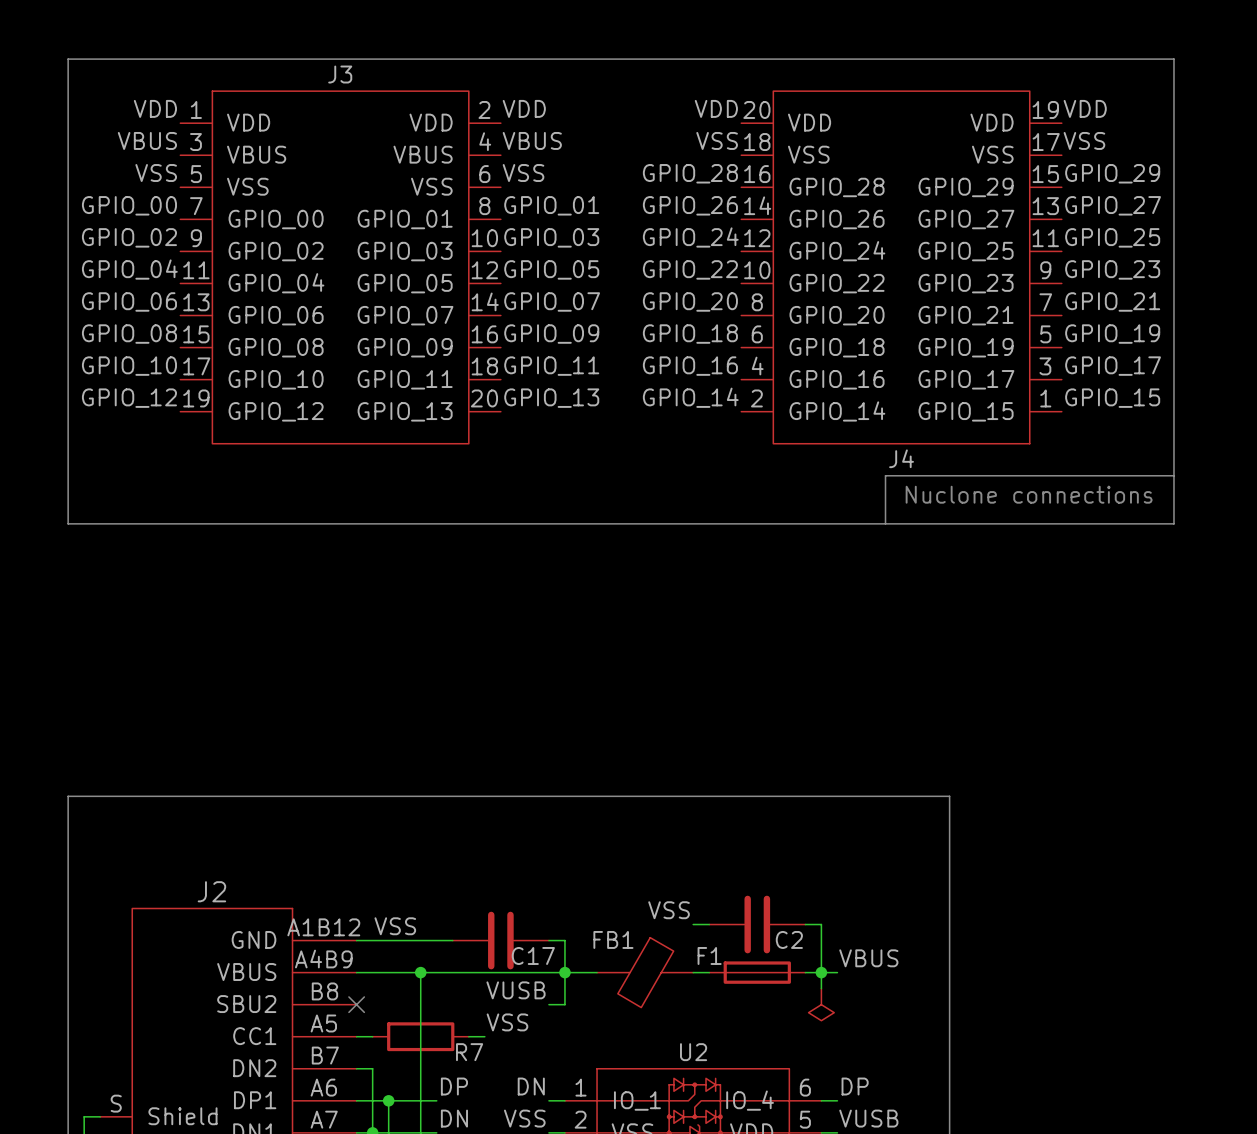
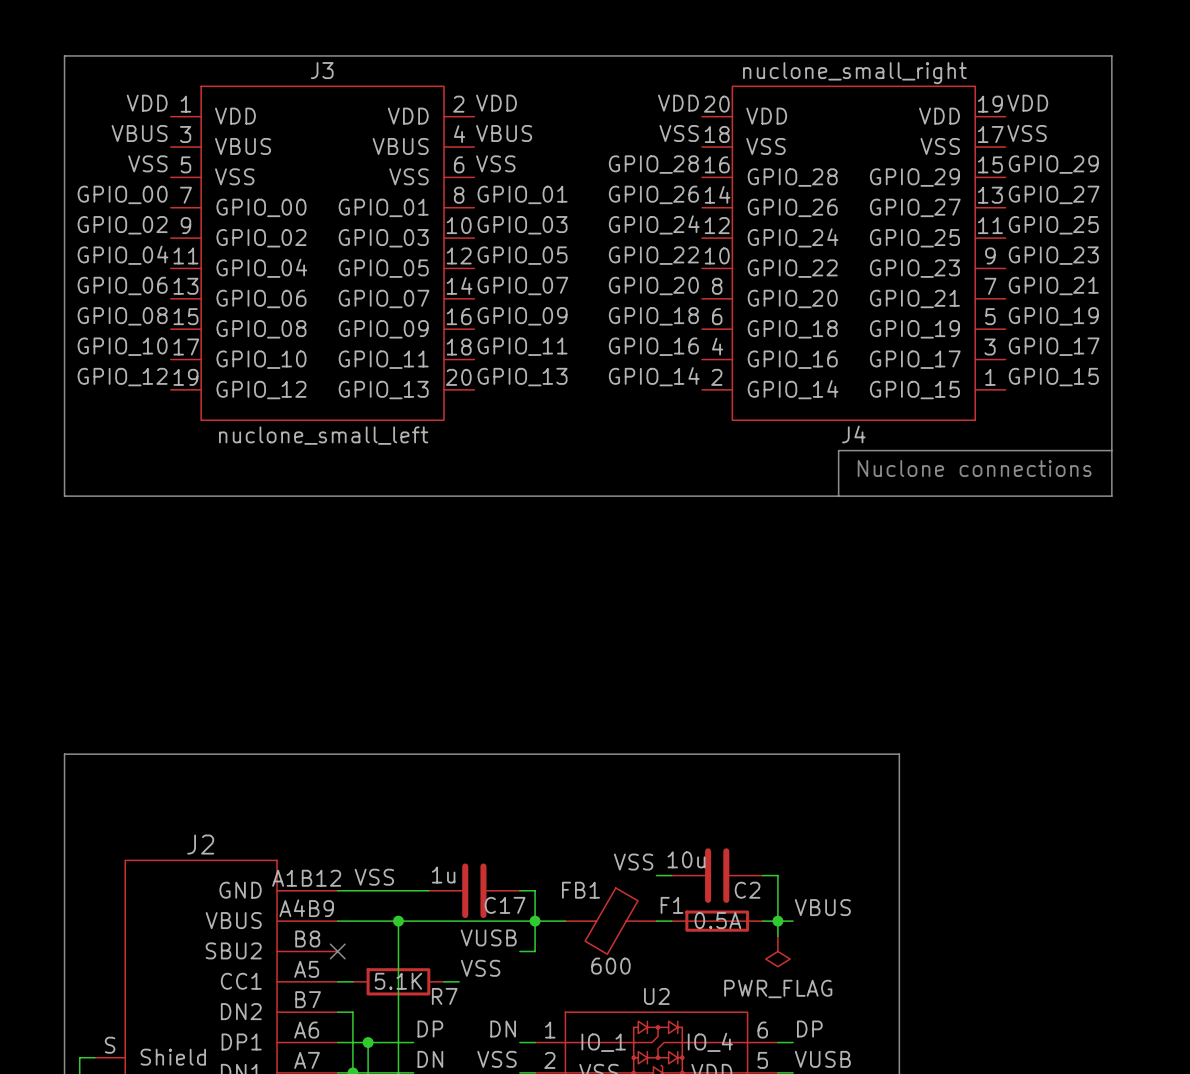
J4 value: none -> nuclone_small_right (854, 73)
J3 value: none -> nuclone_small_left (323, 435)
C2 value: none -> 10u (686, 859)
C17 value: none -> 1u (443, 875)
F1 value: none -> 0.5A (717, 920)
FB1 value: none -> 600 (610, 966)
R7 value: none -> 5.1K (398, 981)
power symbol text: none -> PWR_FLAG (778, 988)

